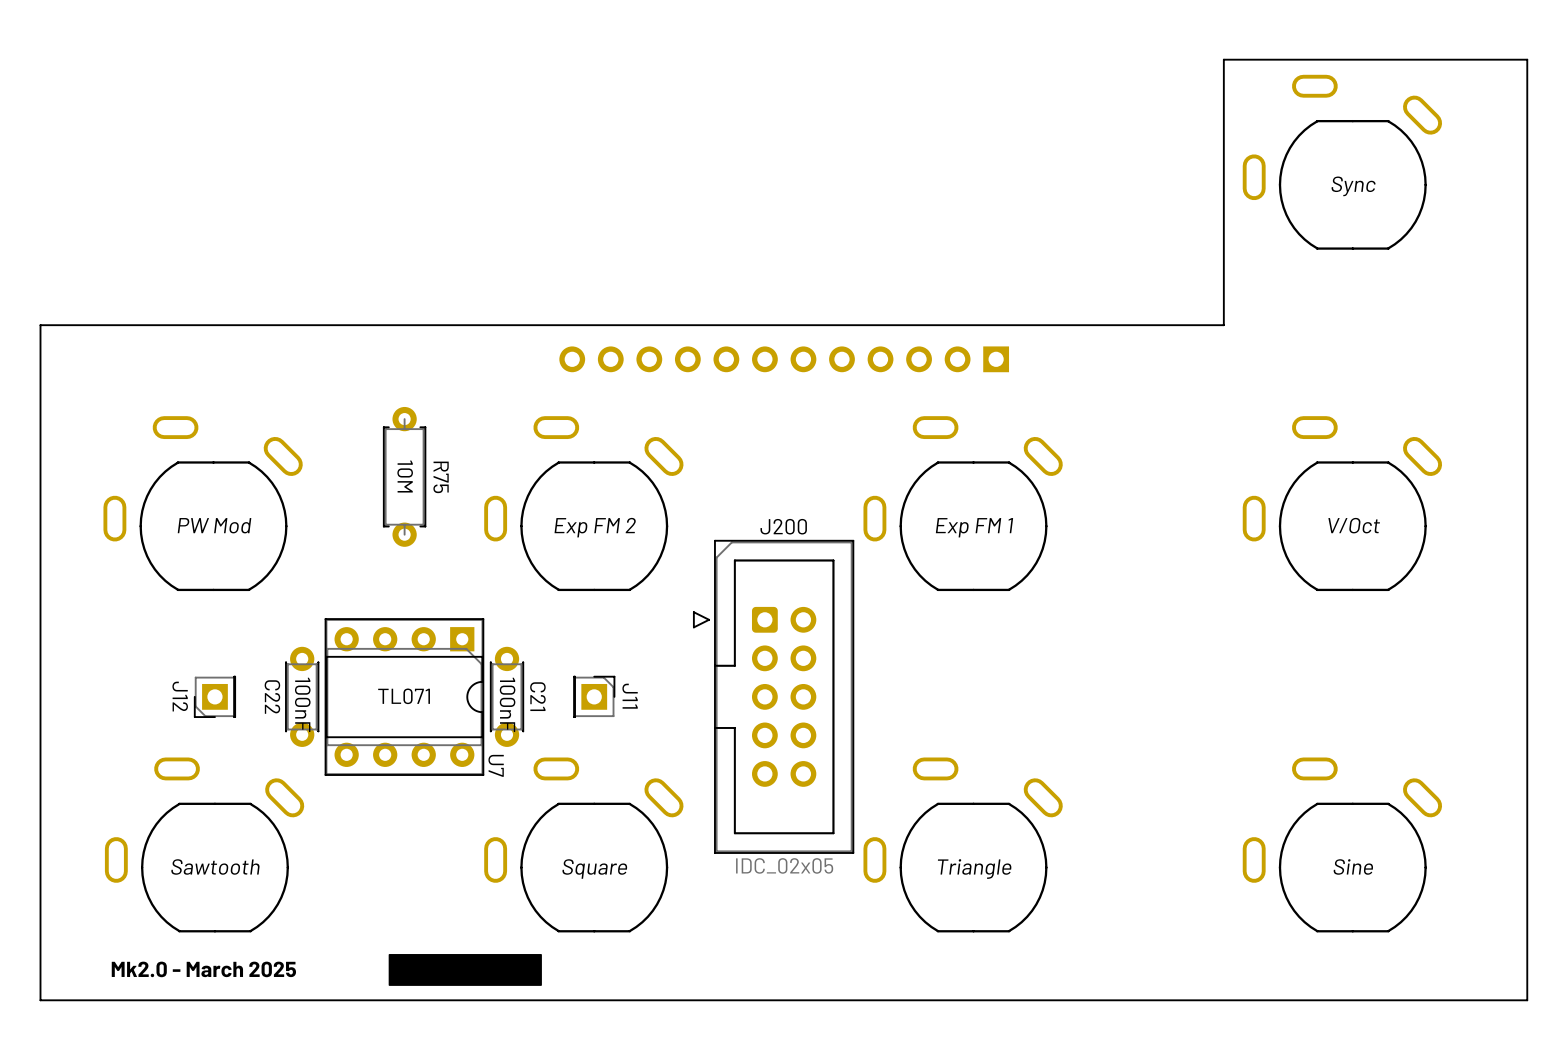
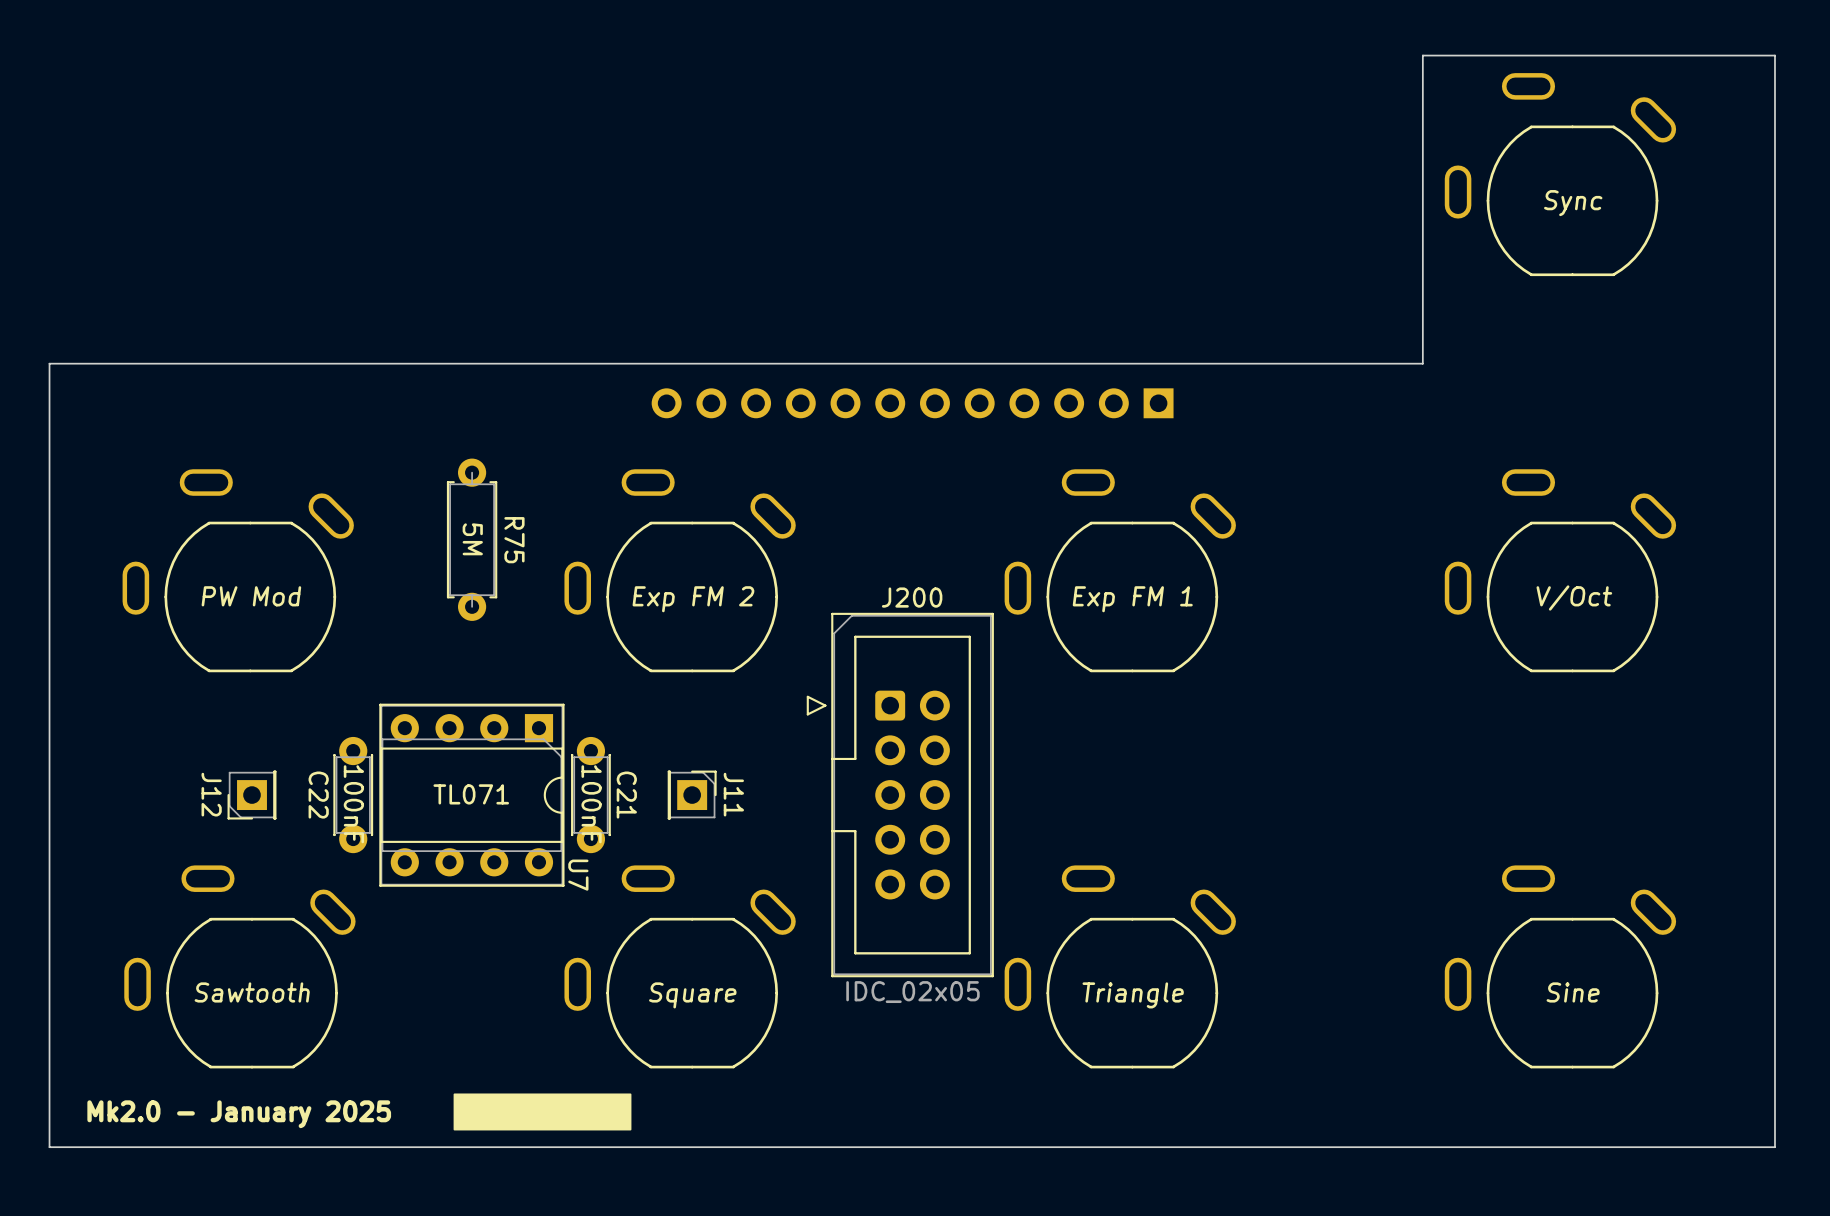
R75 value: 10M (405, 476) -> 5M (472, 539)
text: Mk2.0 - March 2025 (203, 969) -> Mk2.0 - January 2025 (239, 1114)

